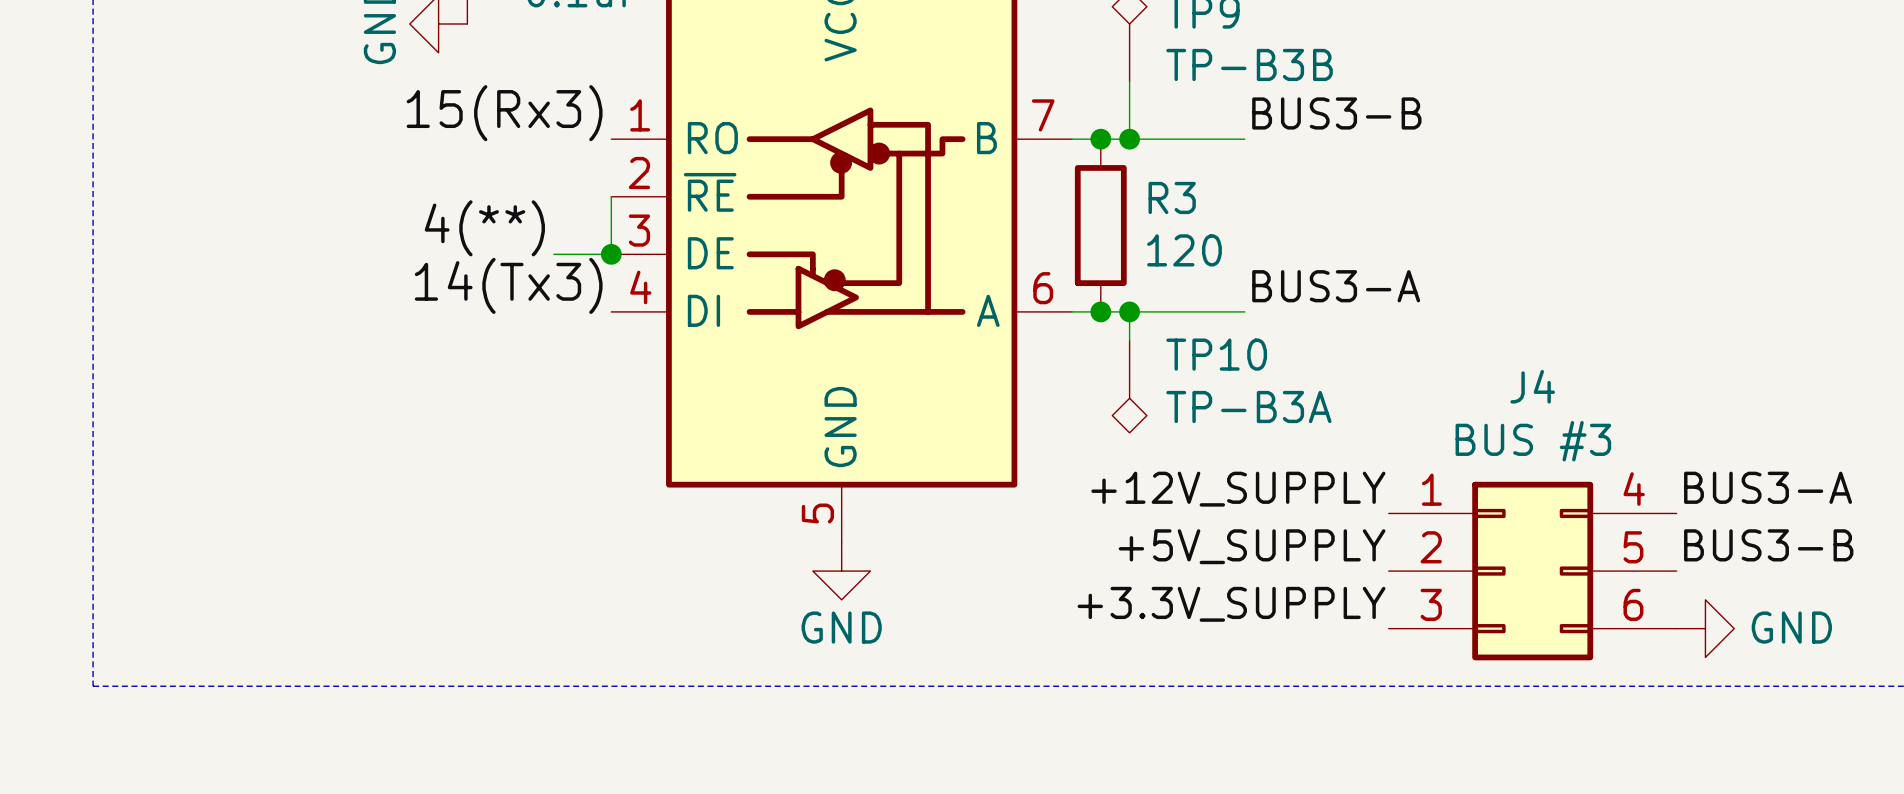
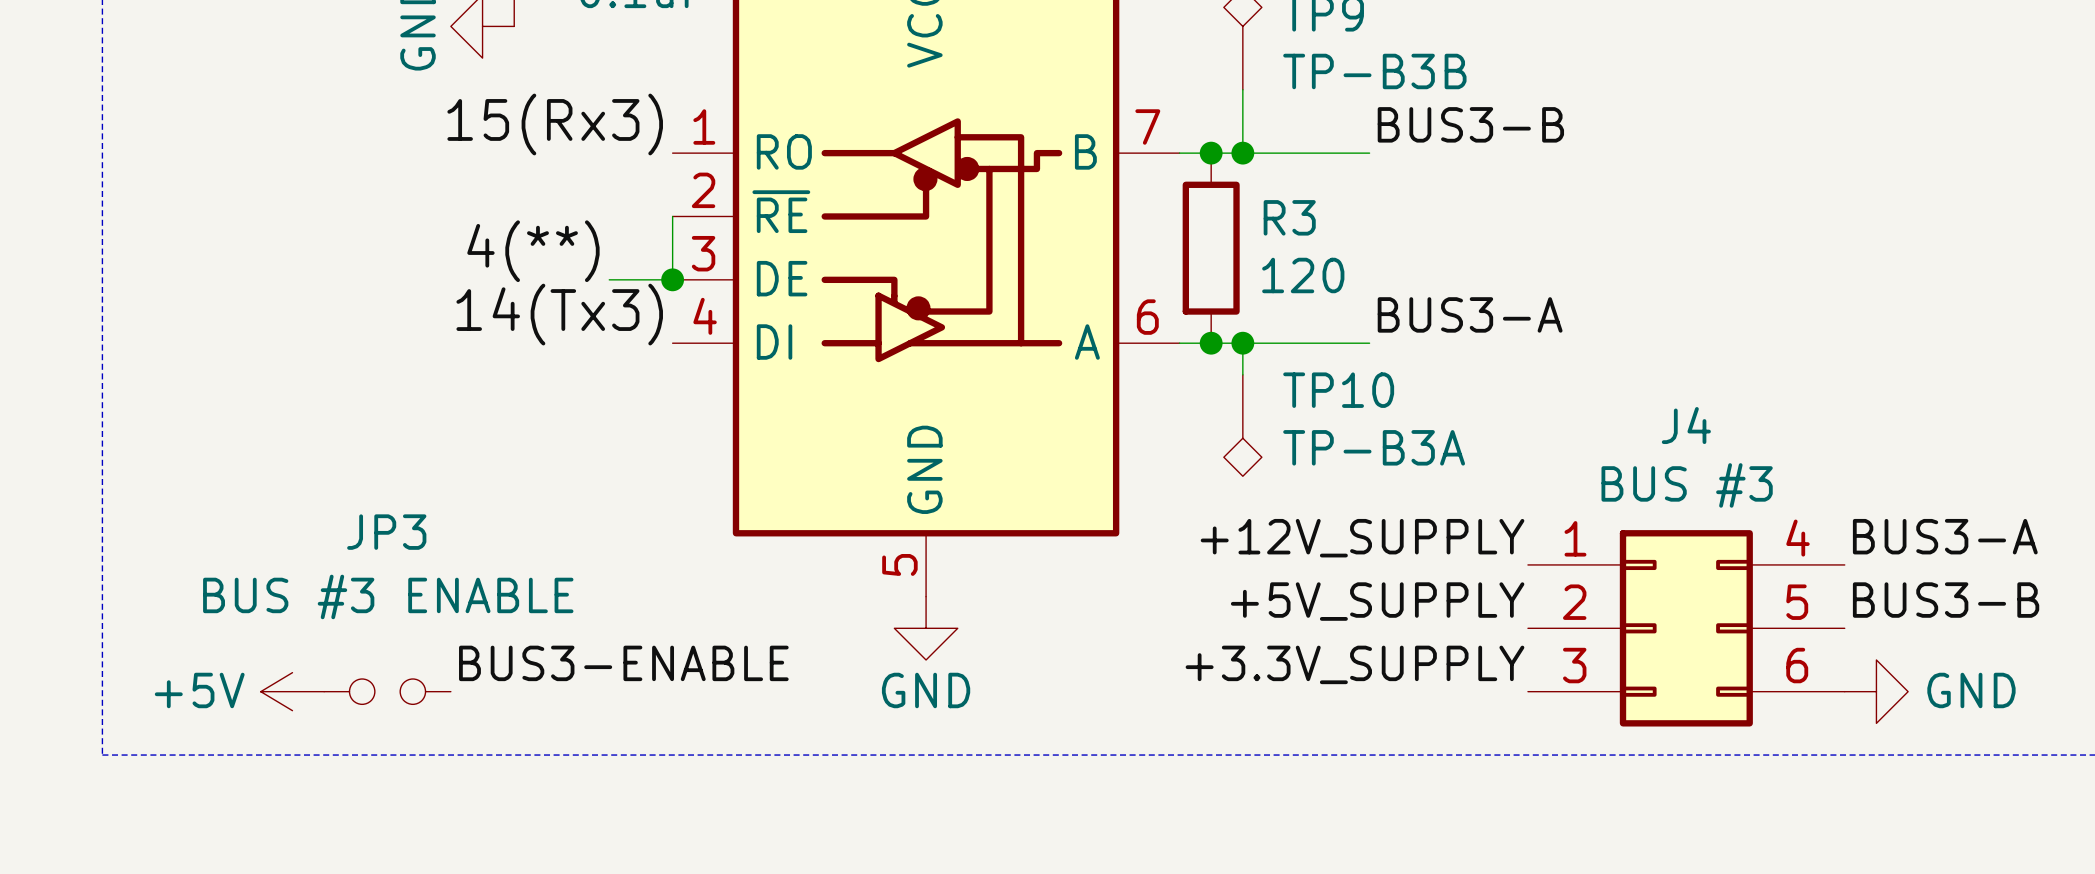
label: none -> BUS3-ENABLE (623, 663)
power symbol: none -> +5V (292, 691)
JP3: none -> BUS #3 ENABLE (387, 691)

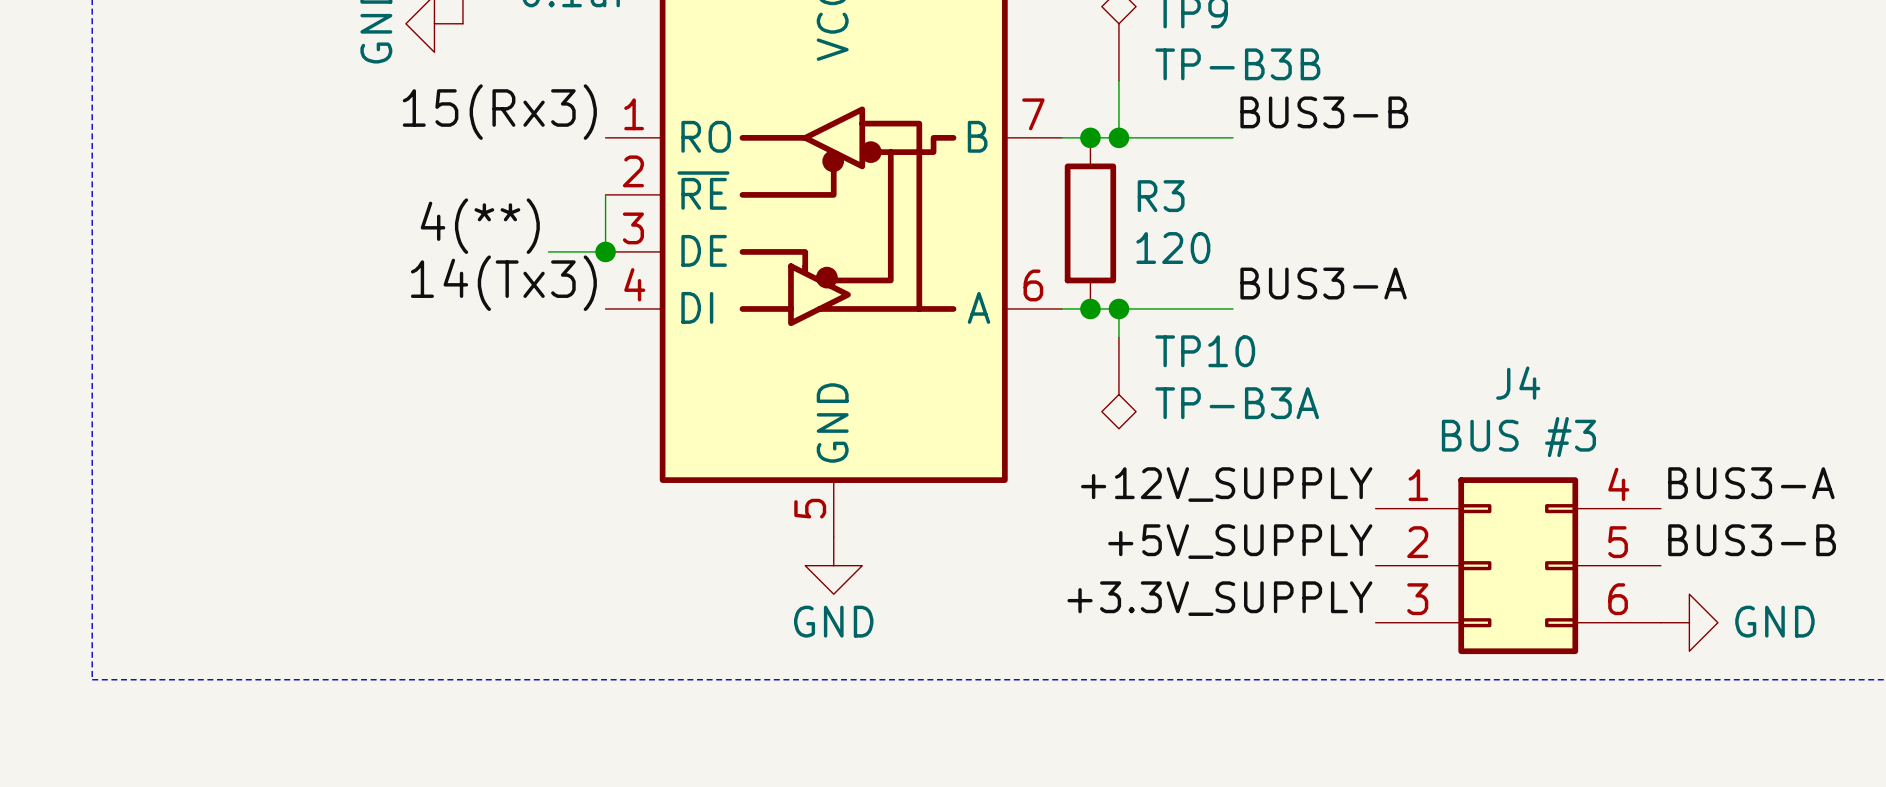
label: BUS3-ENABLE (623, 663) -> none
power symbol: +5V (292, 691) -> none
JP3: BUS #3 ENABLE (387, 691) -> none

